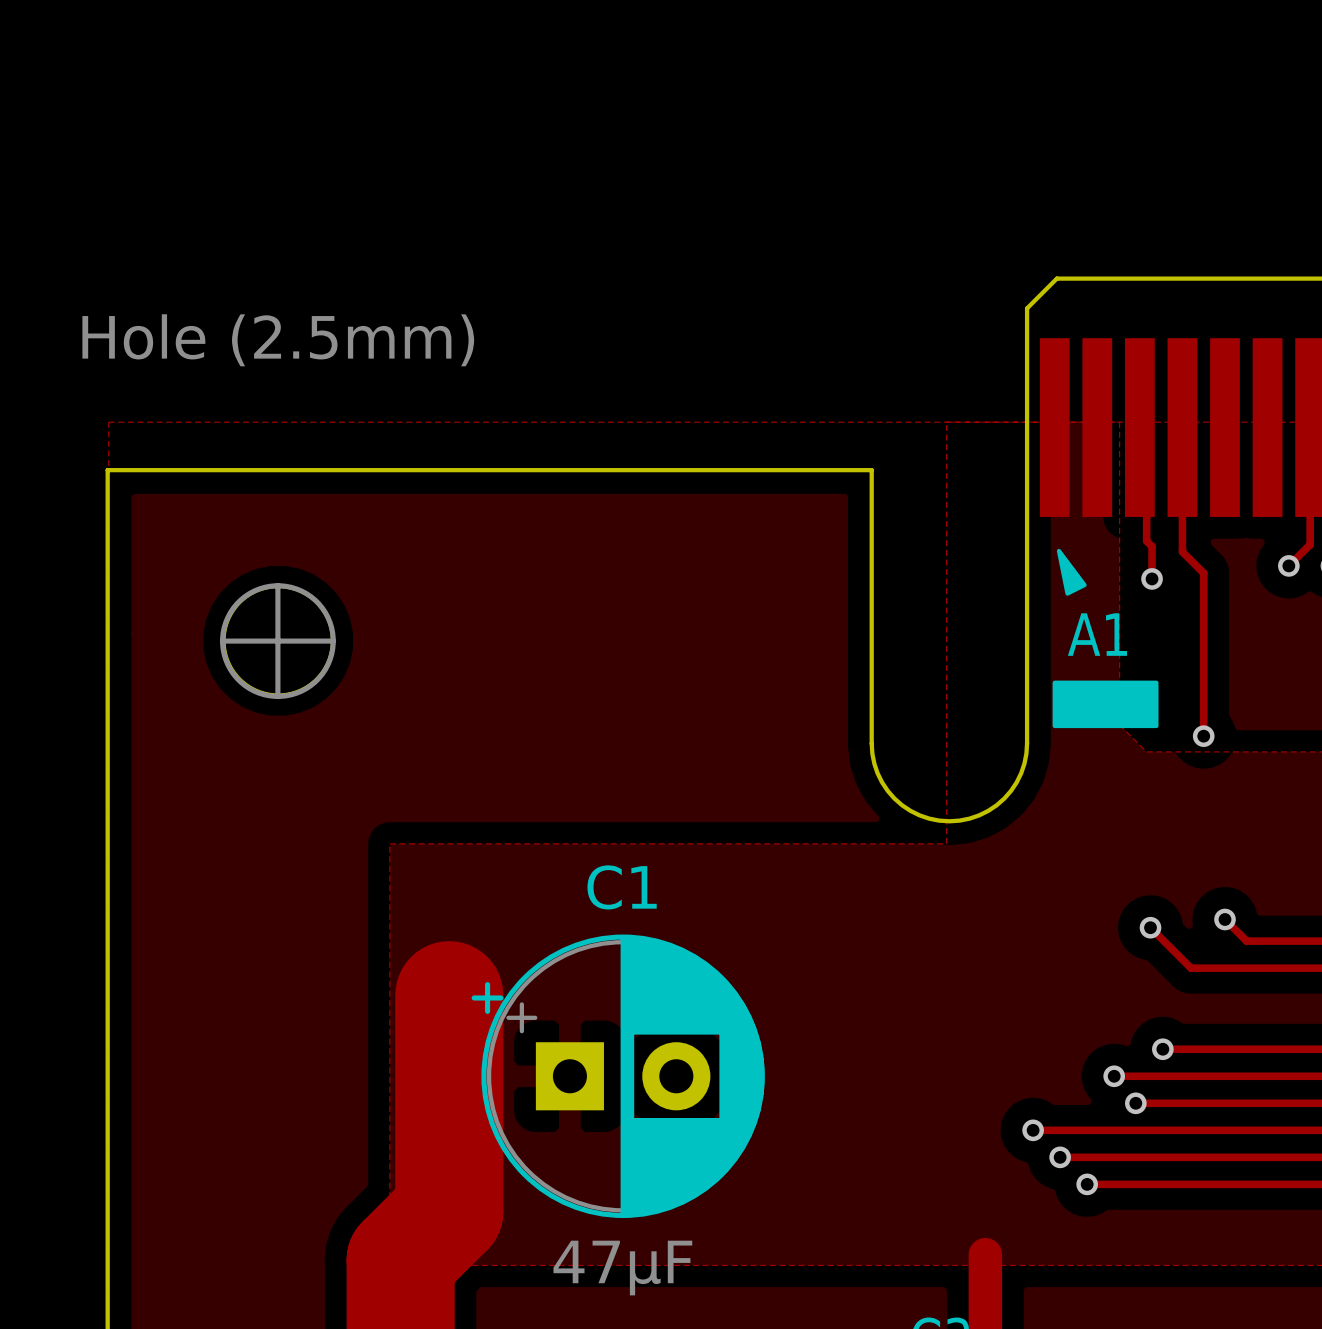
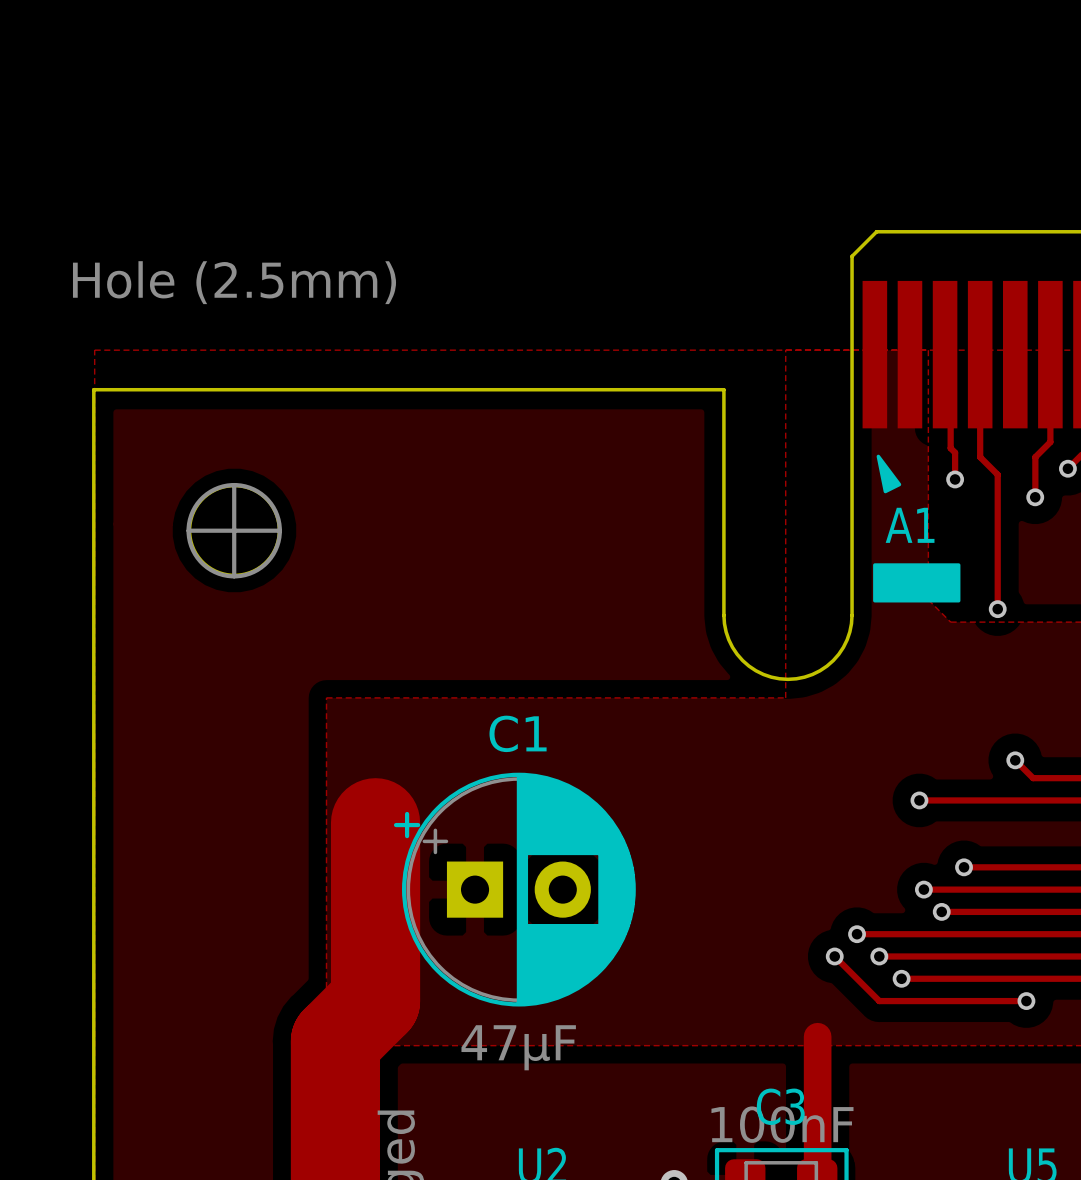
track: none -> (1050, 354) (1050, 442) (1035, 457) (1035, 497)
via: none -> (1035, 497)
track: (1150, 927) (1190, 968) -> (919, 800) (987, 800)
via position: (1150, 927) -> (919, 800)
track: none -> (834, 956) (879, 1001) (1026, 1001)
via: none -> (834, 956)
via: none -> (1026, 1001)

